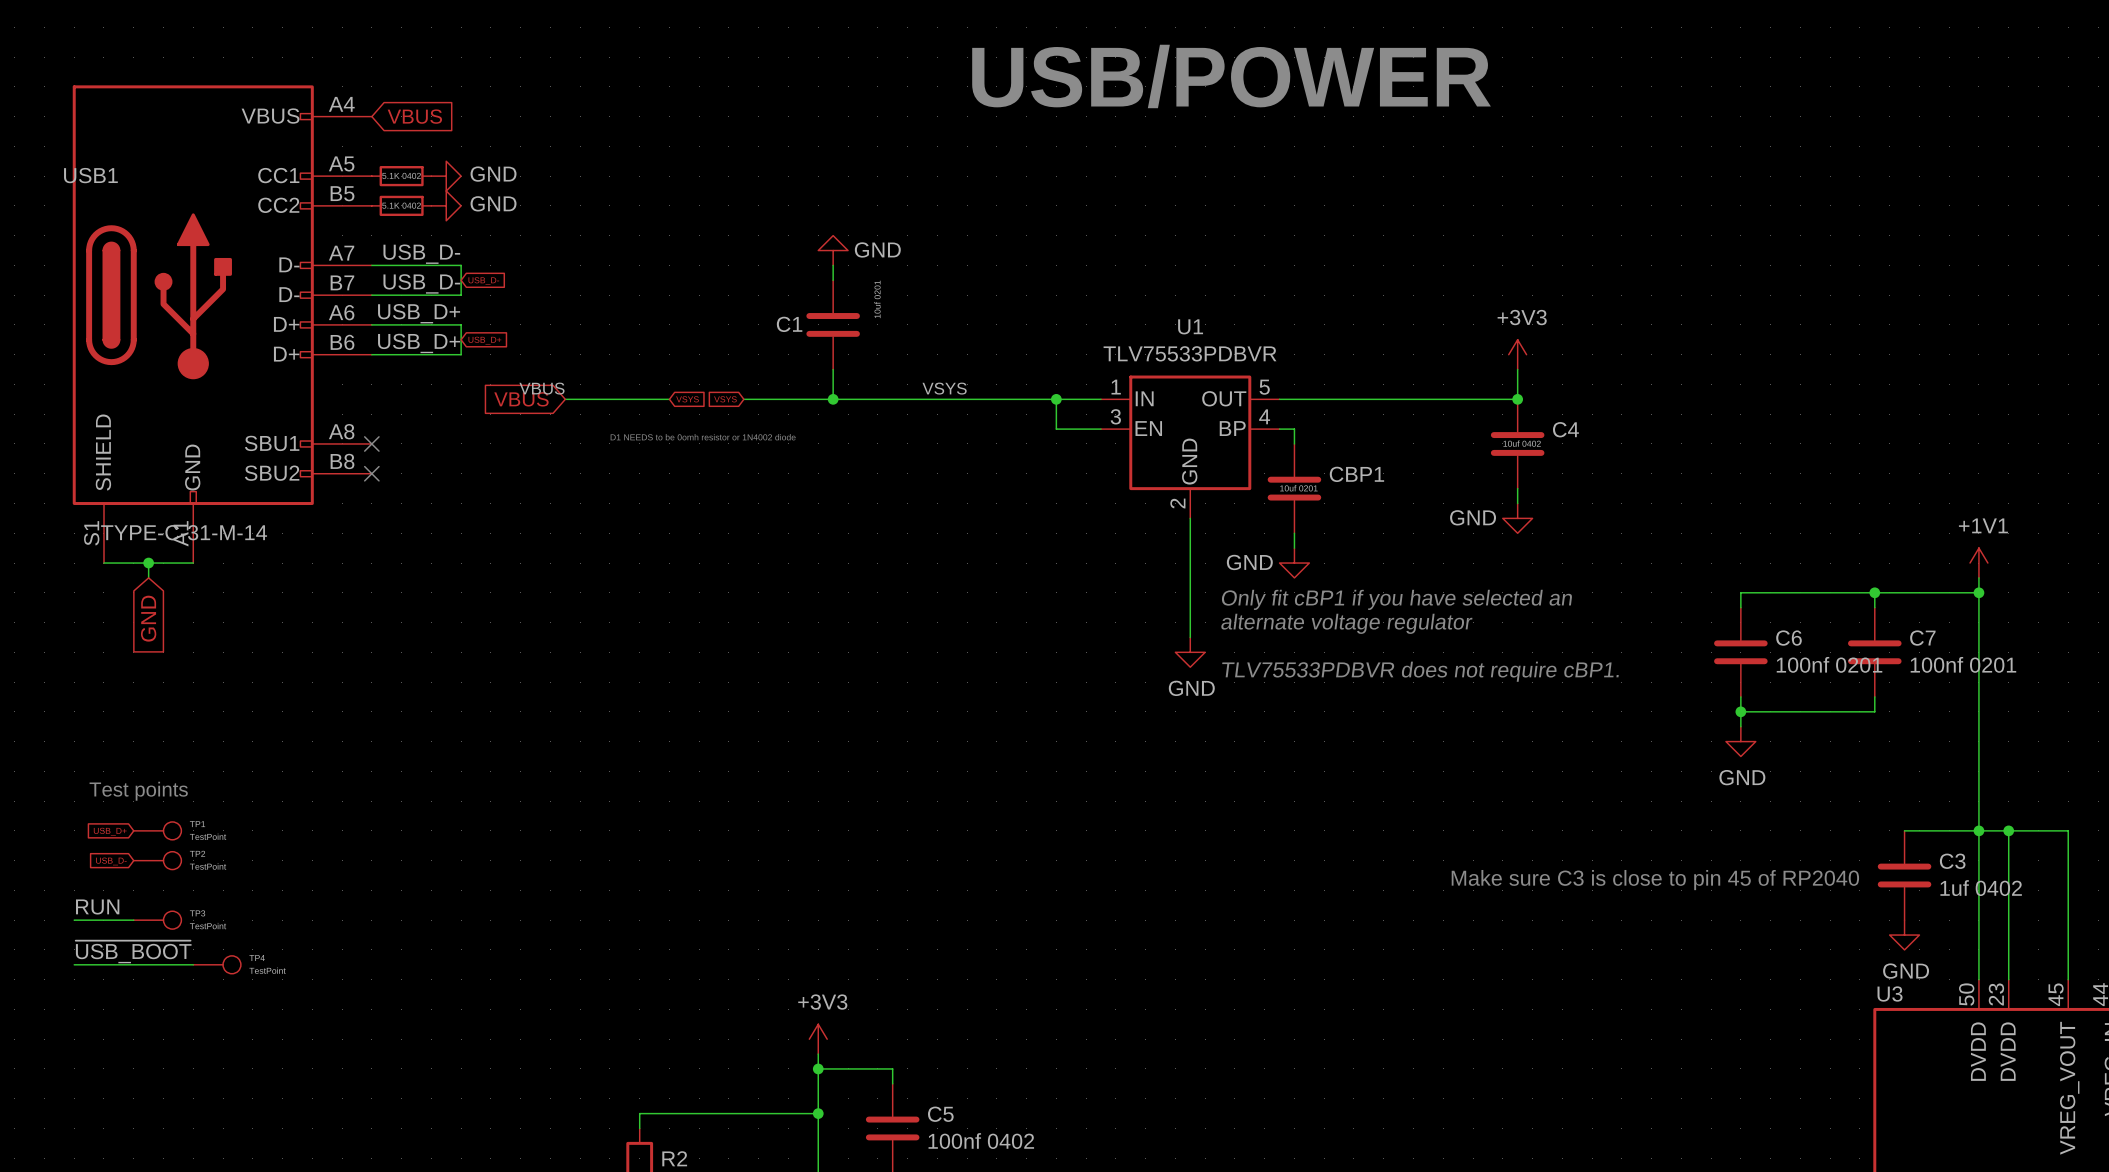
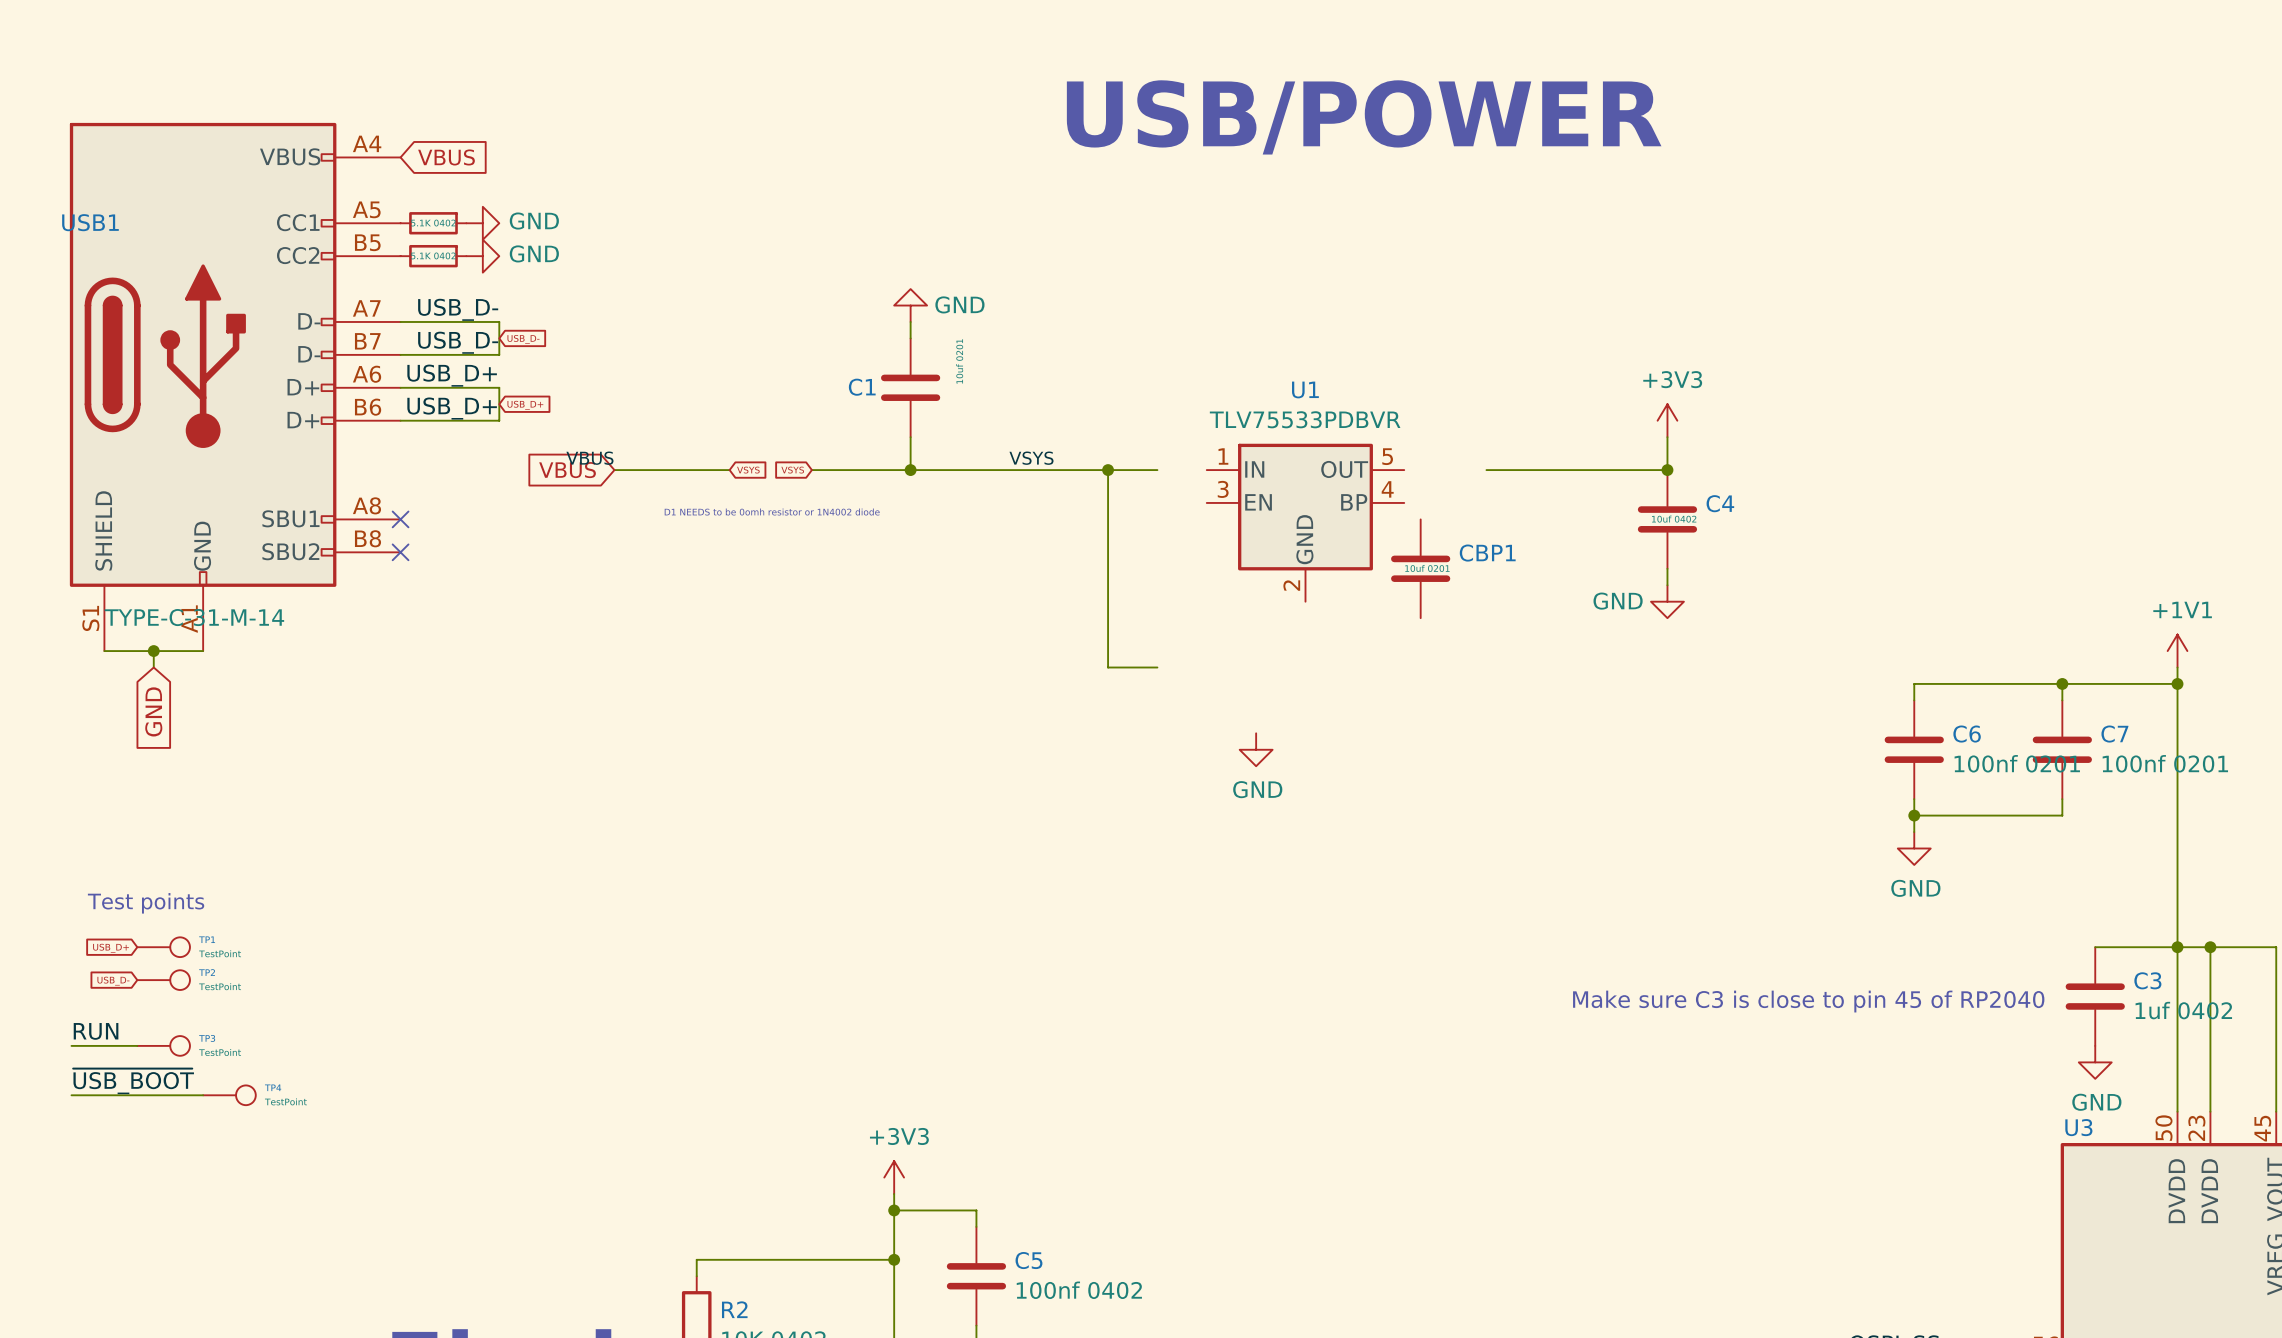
wire: none -> (1108, 470) (1108, 667) (1157, 667)
junction position: (1056, 399) -> (1108, 470)
wire: (1101, 399) (1056, 399) (1056, 429) (1101, 429) -> none
wire: (1279, 399) (1353, 399) -> none
wire: (1279, 429) (1294, 429) (1294, 443) -> none
wire: (1190, 518) (1190, 637) -> none
wire: (1294, 533) (1294, 548) -> none
power symbol: GND (1294, 563) -> none
text: Only fit cBP1 if you have selected an (1396, 599) -> none
text: alternate voltage regulator (1346, 623) -> none
power symbol position: GND (1190, 652) -> GND (1256, 749)
text: TLV75533PDBVR does not require cBP1. (1420, 671) -> none

